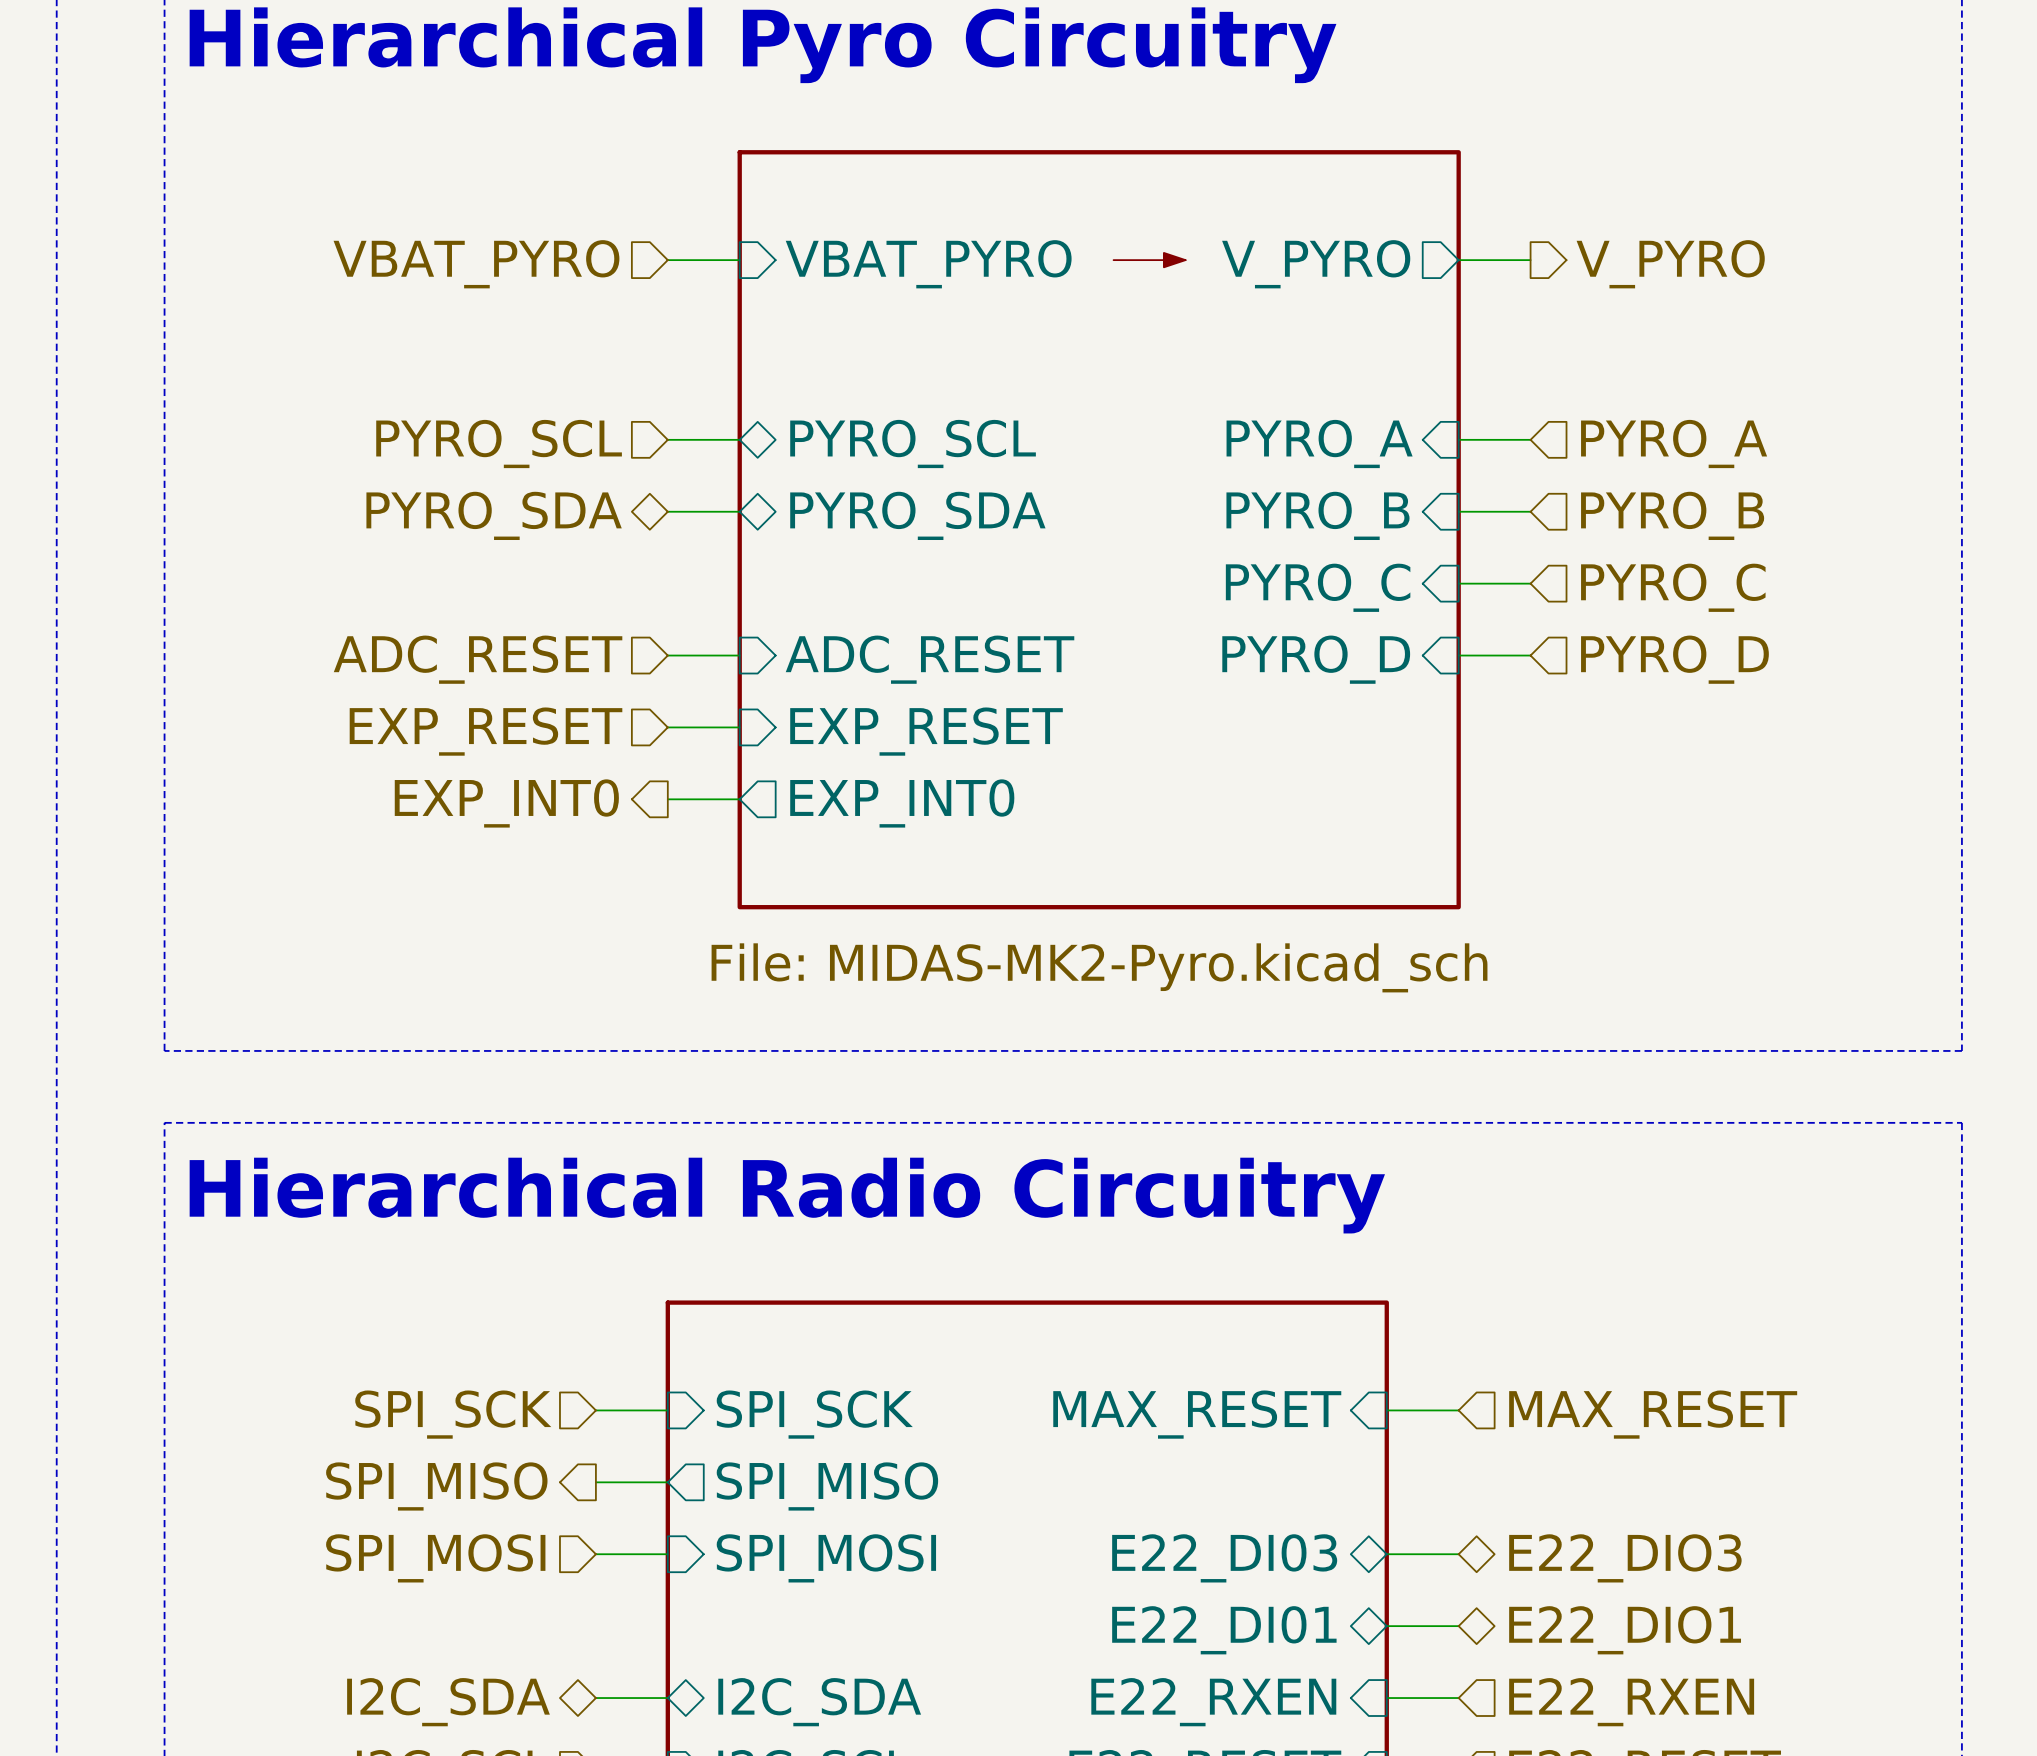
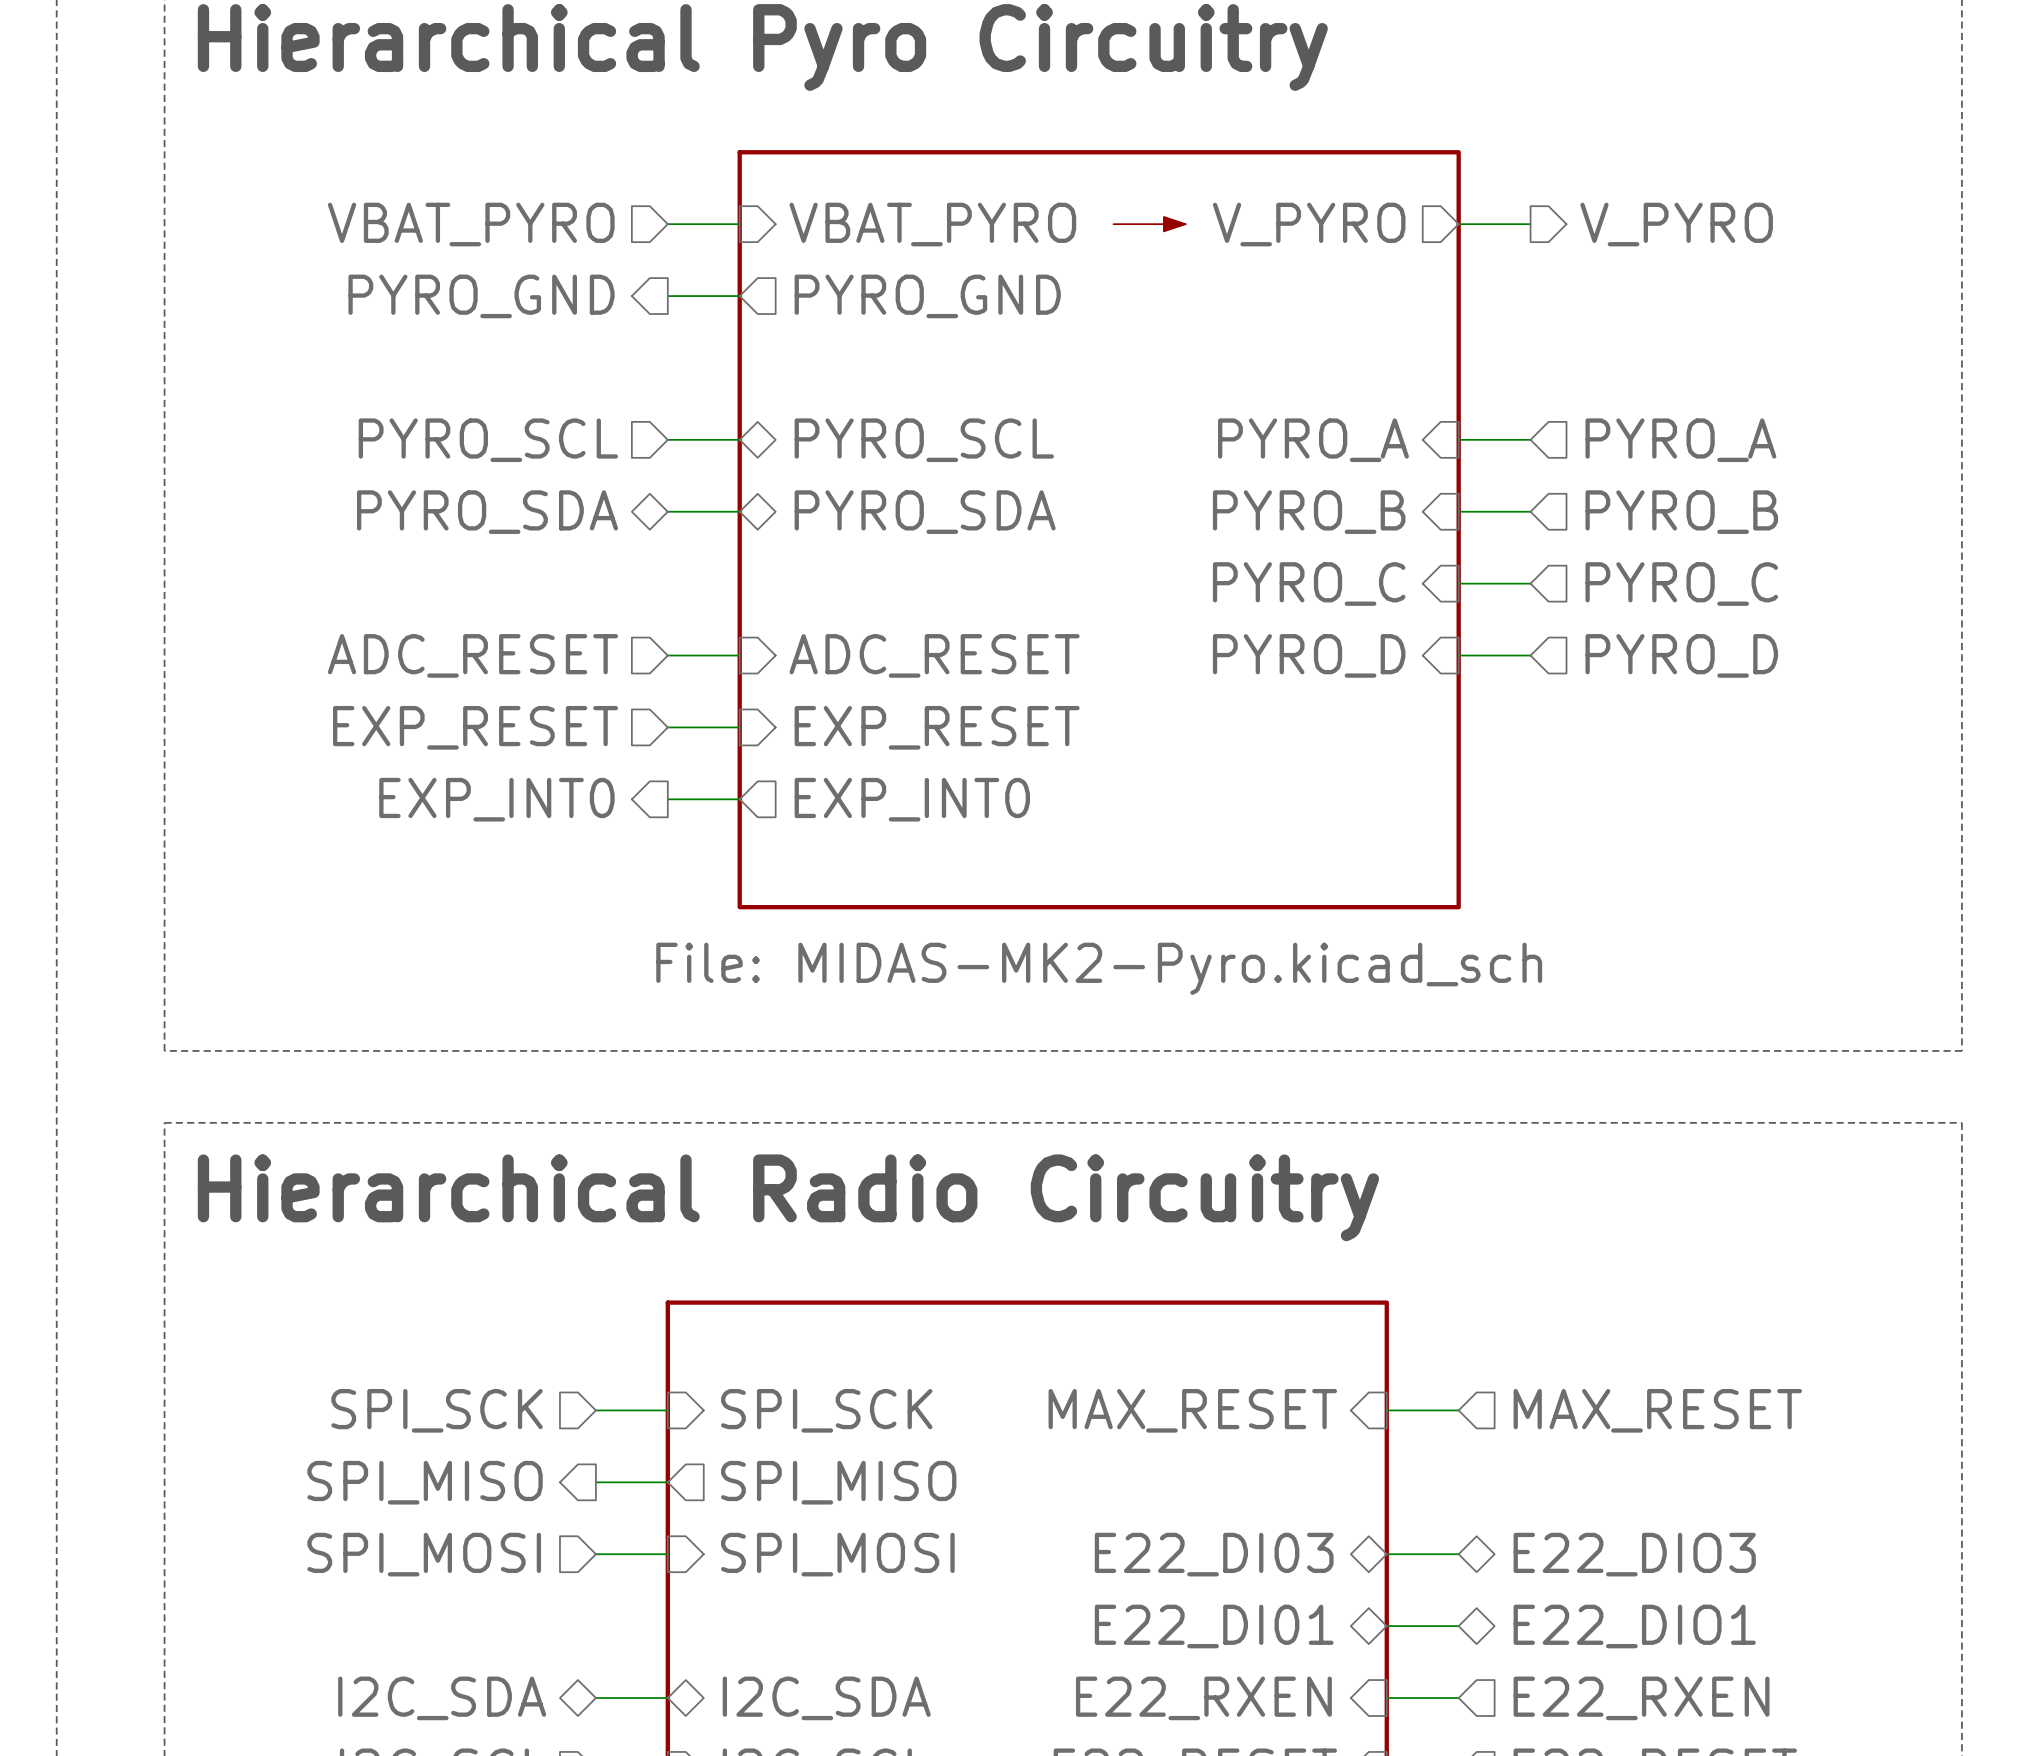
wire: (667, 260) (739, 260) -> (667, 224) (739, 224)
power symbol position: (1149, 260) -> (1149, 224)
wire: (1458, 260) (1530, 260) -> (1458, 224) (1530, 224)
hierarchical label position: VBAT_PYRO (476, 264) -> VBAT_PYRO (471, 224)
sheet pin position: VBAT_PYRO (928, 264) -> VBAT_PYRO (932, 224)
sheet pin position: V_PYRO (1316, 264) -> V_PYRO (1309, 224)
hierarchical label position: V_PYRO (1670, 264) -> V_PYRO (1676, 224)
wire: none -> (667, 296) (739, 296)
hierarchical label: none -> PYRO_GND (481, 296)
sheet pin: none -> PYRO_GND (927, 296)

